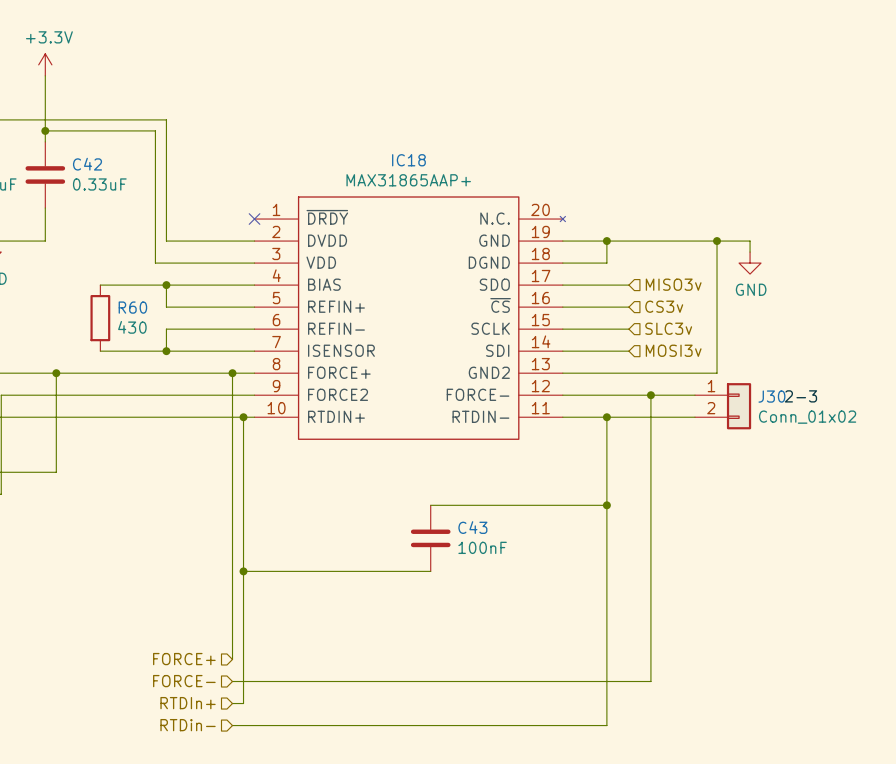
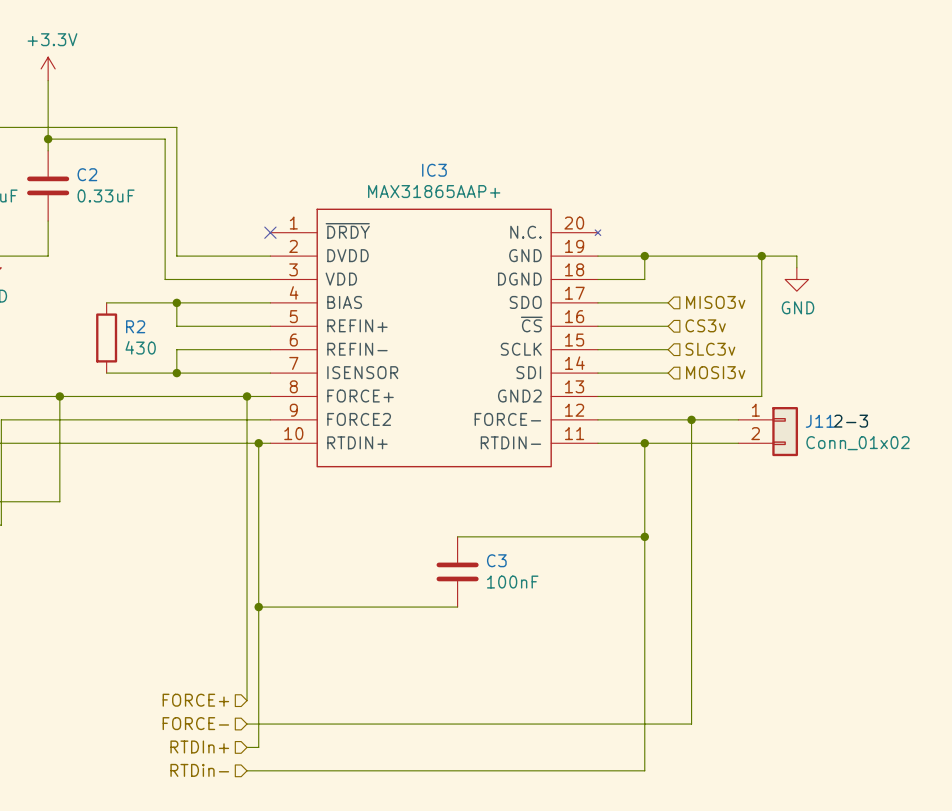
IC18 name: IC18 (408, 160) -> IC3 (434, 170)
C42 name: C42 (87, 164) -> C2 (87, 174)
R60 name: R60 (132, 307) -> R2 (135, 326)
J30 name: J30 (771, 396) -> J11 (820, 421)
C43 name: C43 (472, 527) -> C3 (496, 560)

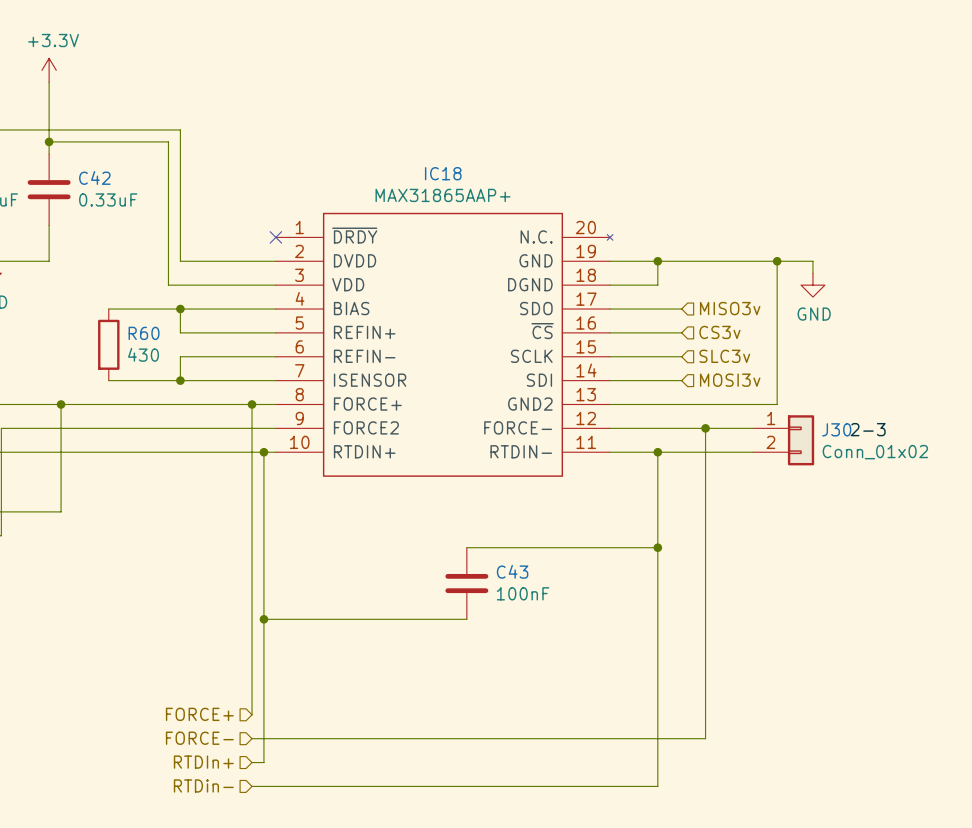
IC3 name: IC3 (434, 170) -> IC18 (443, 173)
C2 name: C2 (87, 174) -> C42 (94, 177)
R2 name: R2 (135, 326) -> R60 (144, 333)
J11 name: J11 (820, 421) -> J30 (836, 429)
C3 name: C3 (496, 560) -> C43 (512, 571)

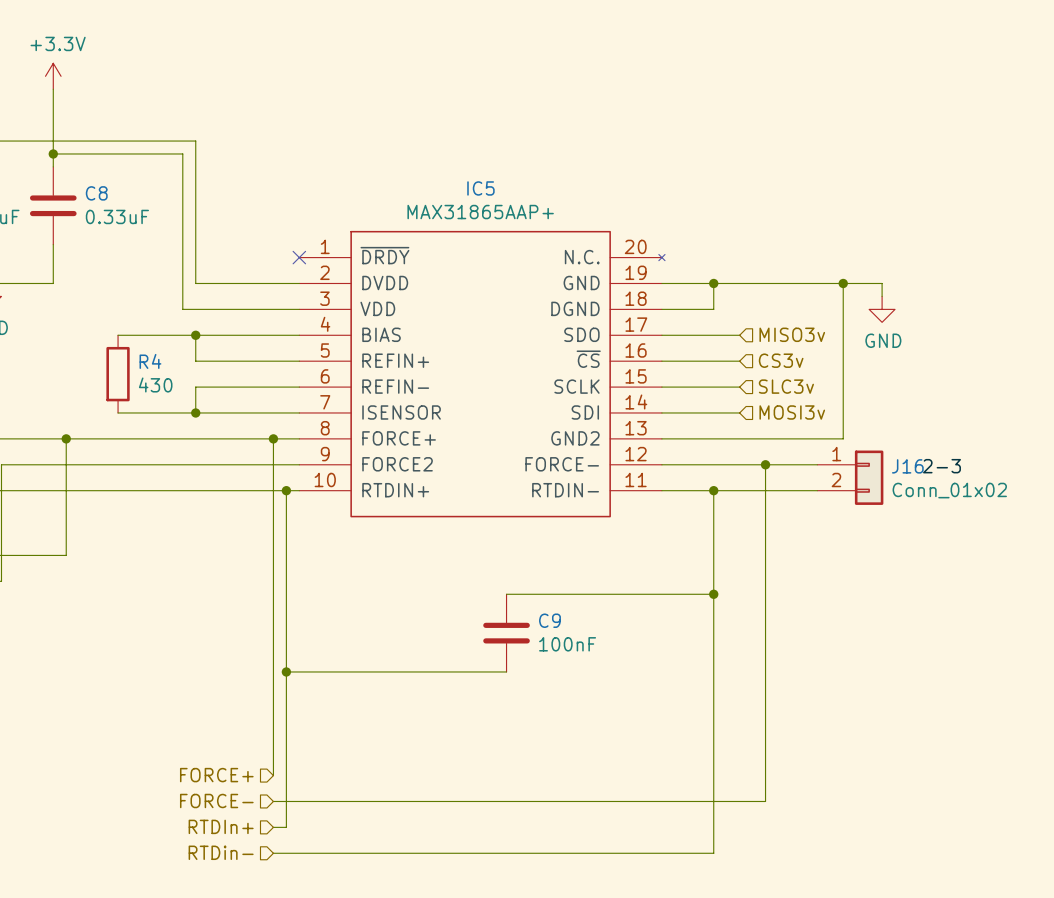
IC18 name: IC18 (443, 173) -> IC5 (480, 188)
C42 name: C42 (94, 177) -> C8 (96, 193)
R60 name: R60 (144, 333) -> R4 (150, 361)
J30 name: J30 (836, 429) -> J16 (907, 466)
C43 name: C43 (512, 571) -> C9 (549, 620)

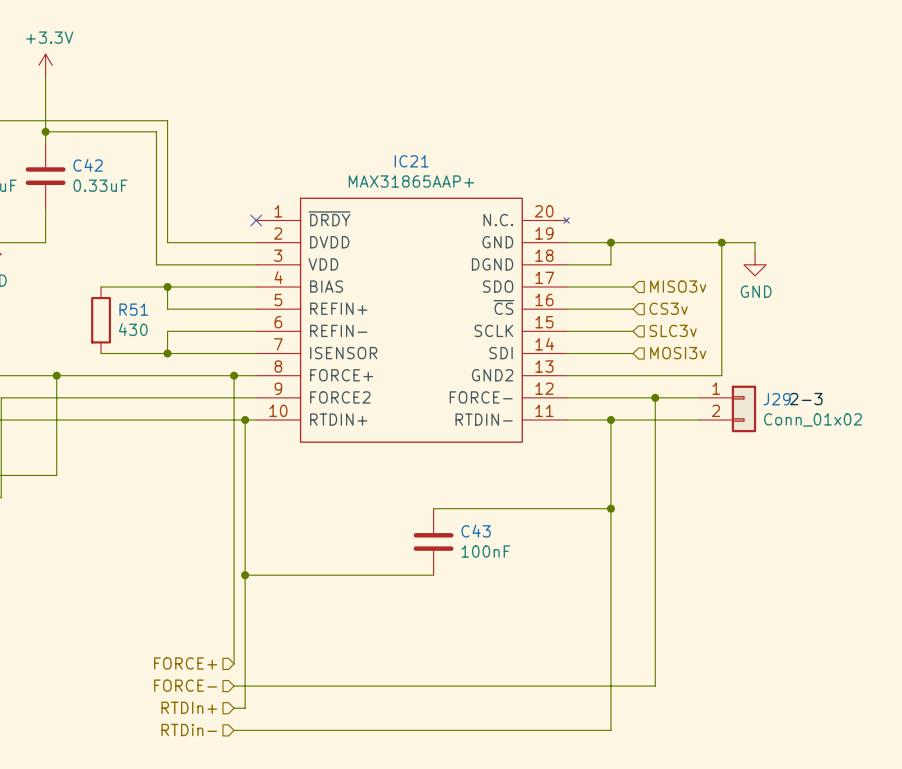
IC5 name: IC5 (480, 188) -> IC21 (411, 161)
C8 name: C8 (96, 193) -> C42 (88, 165)
R4 name: R4 (150, 361) -> R51 (133, 309)
J16 name: J16 (907, 466) -> J29 (777, 399)
C9 name: C9 (549, 620) -> C43 (476, 531)

